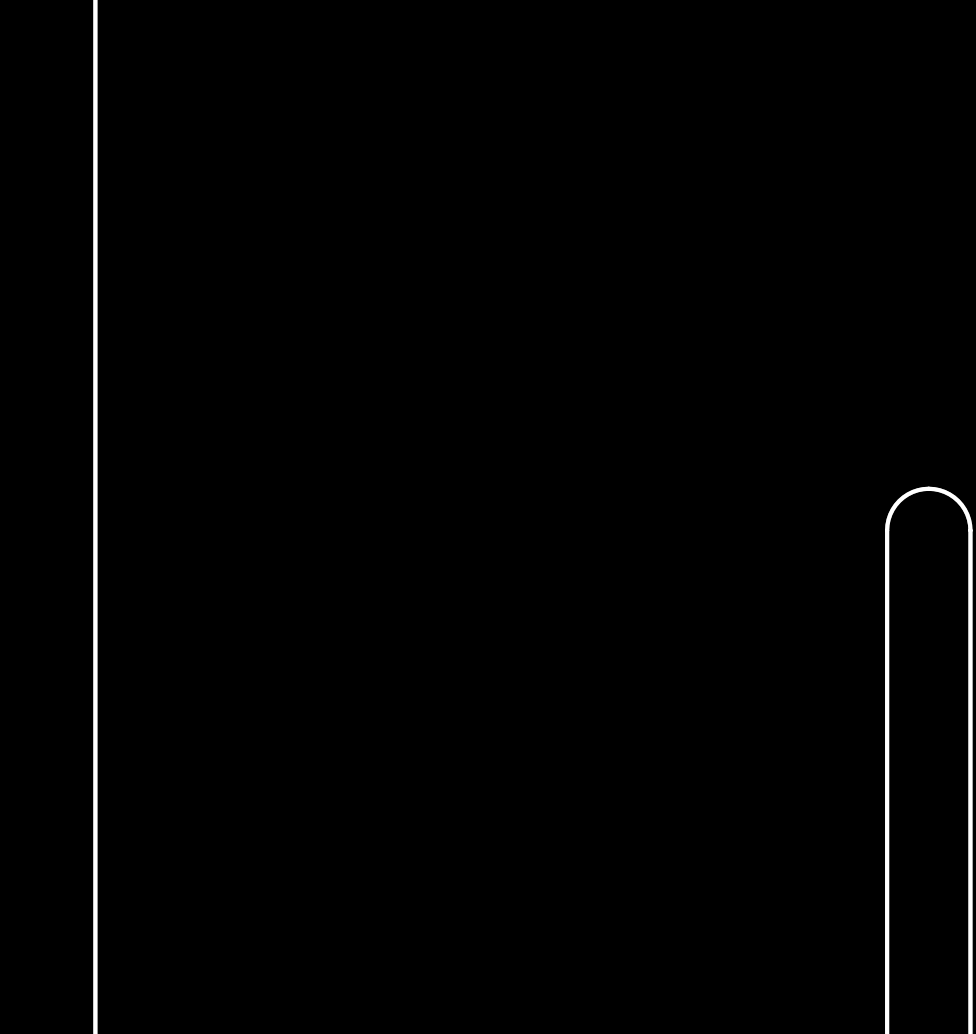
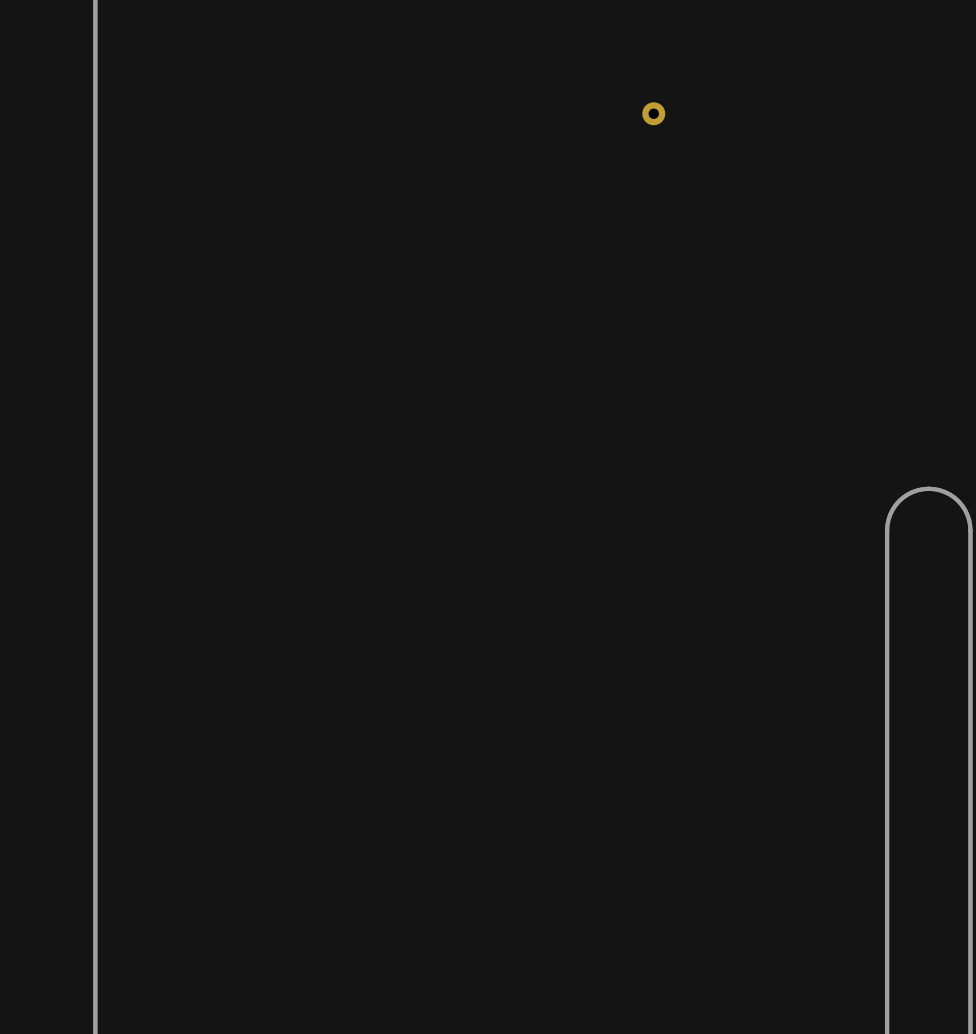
via: none -> (653, 113)

